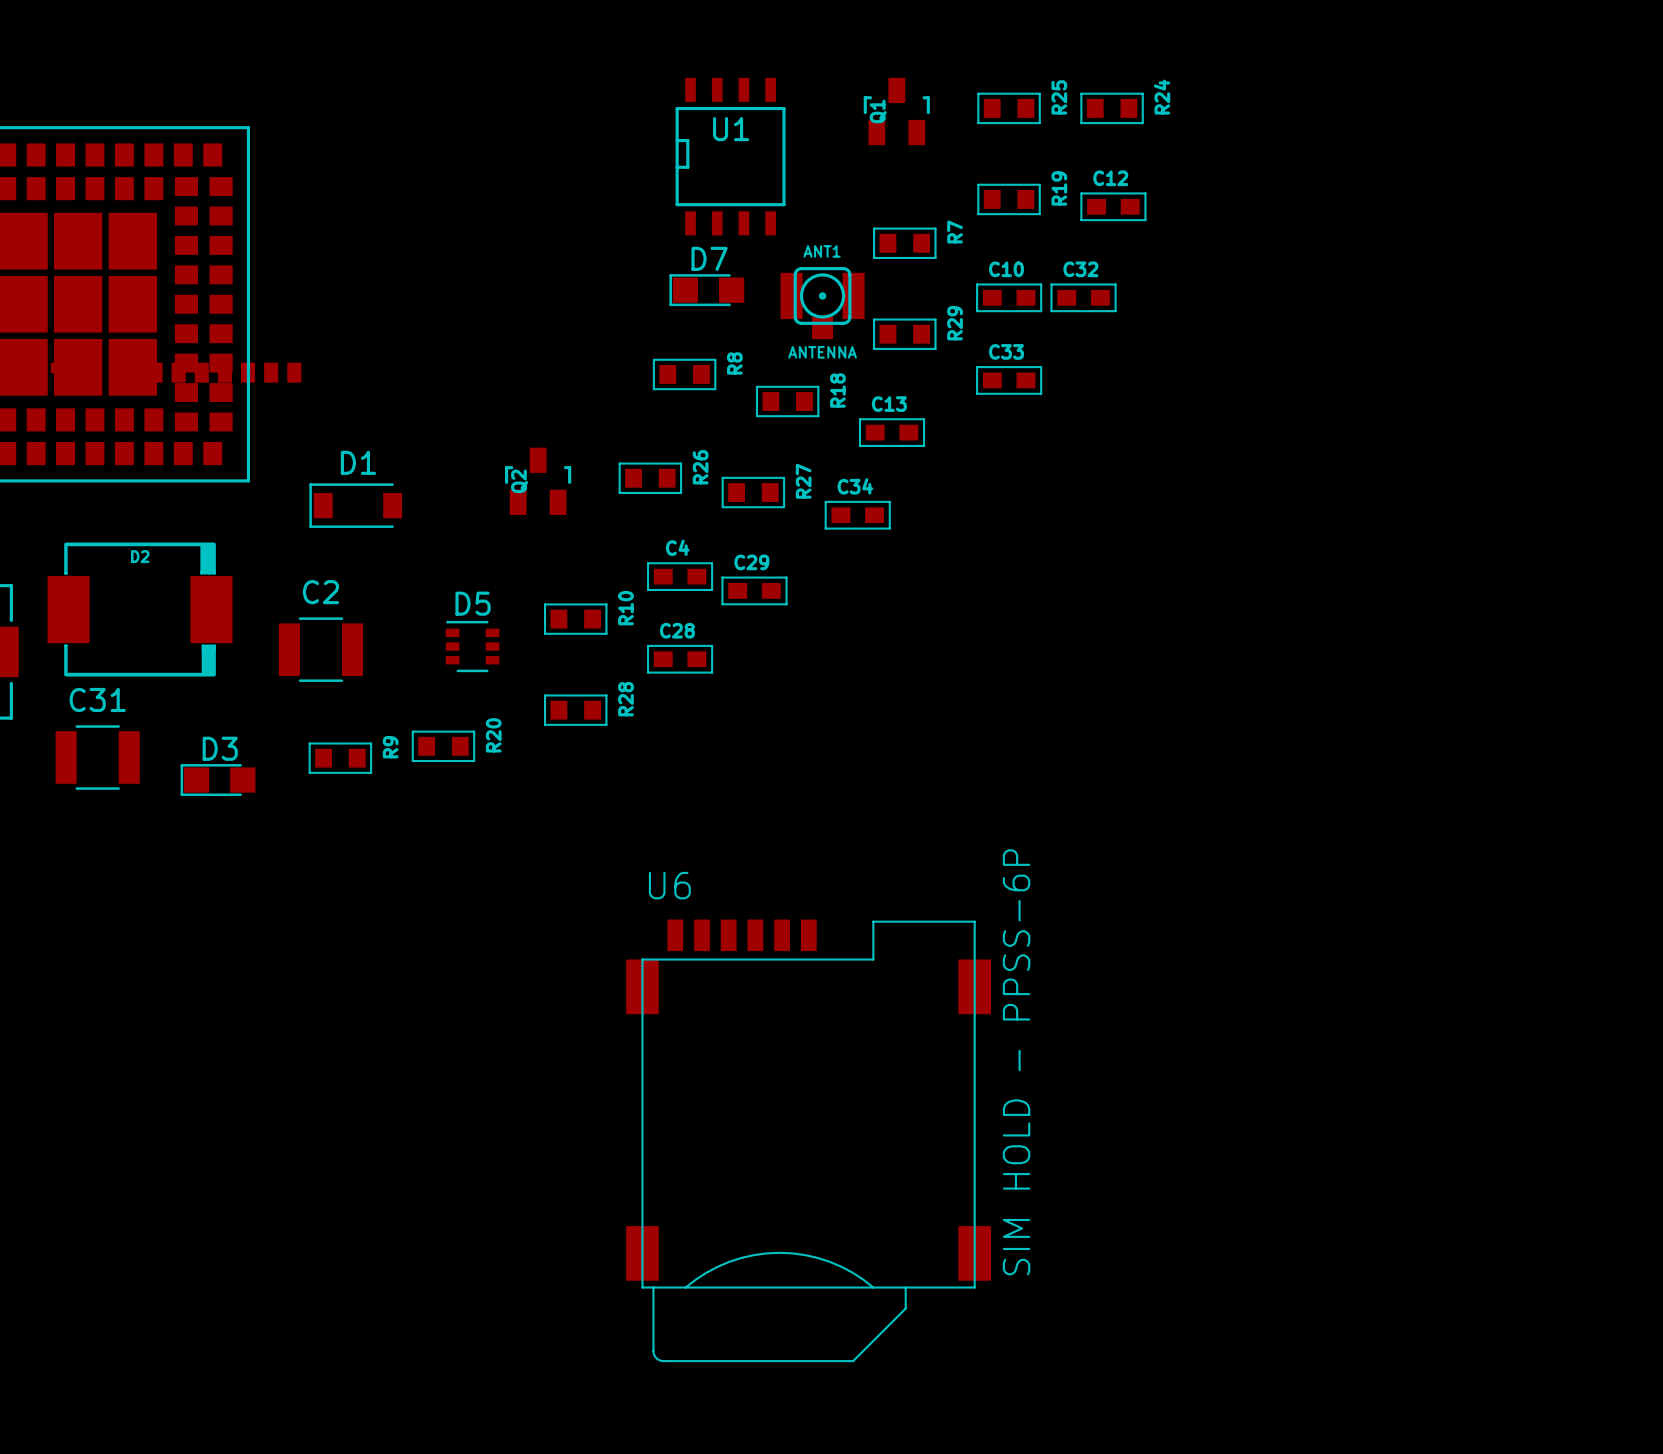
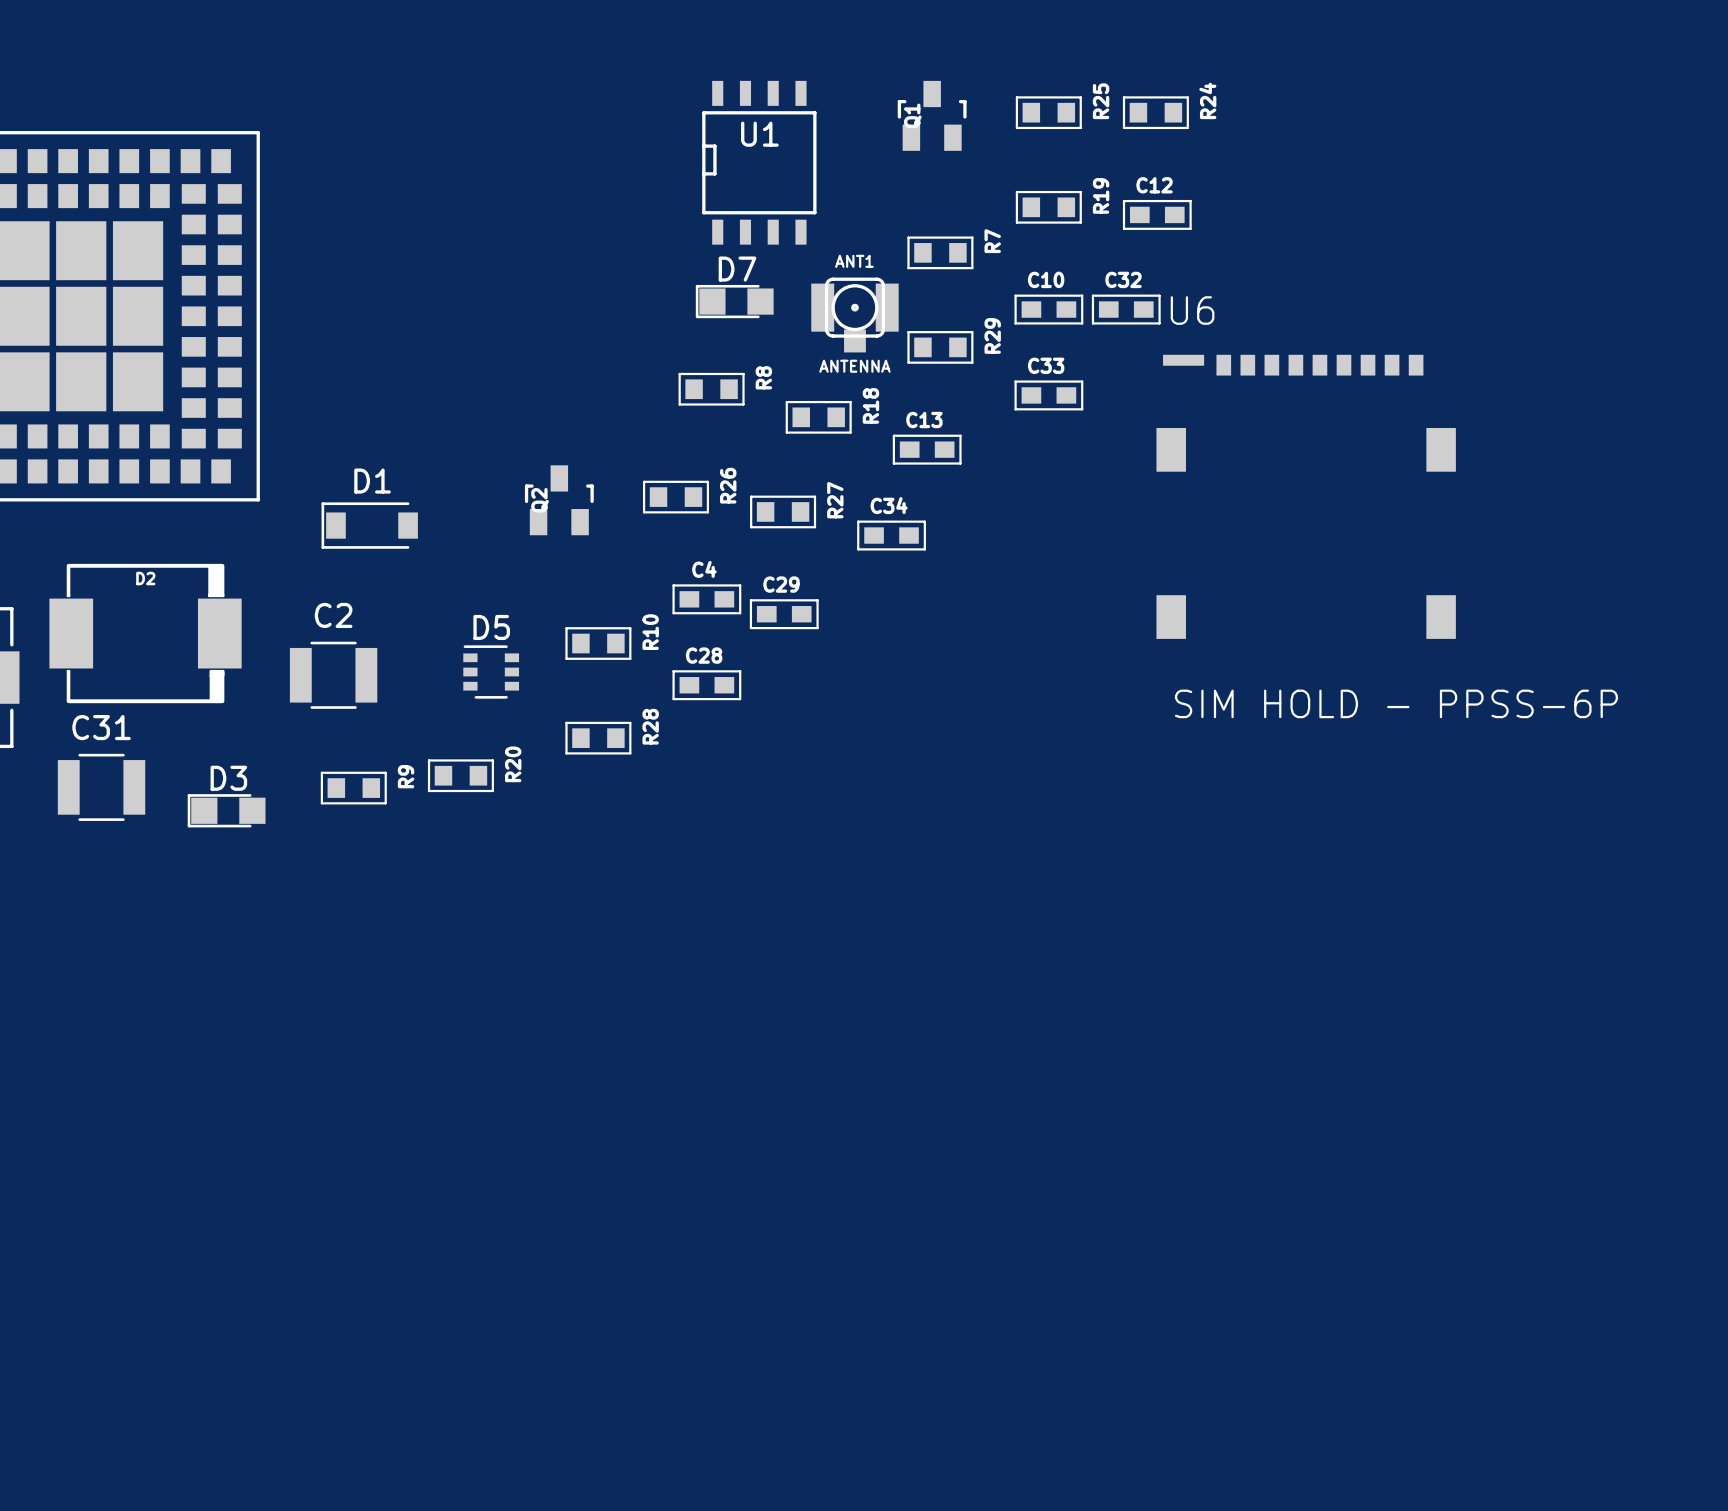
U6 footprint: [50, 362, 991, 1363] -> [1156, 354, 1456, 639]
U6 name position: U6 (669, 885) -> U6 (1192, 310)
U6 value position: SIM HOLD - PPSS-6P (1016, 1062) -> SIM HOLD - PPSS-6P (1396, 703)

